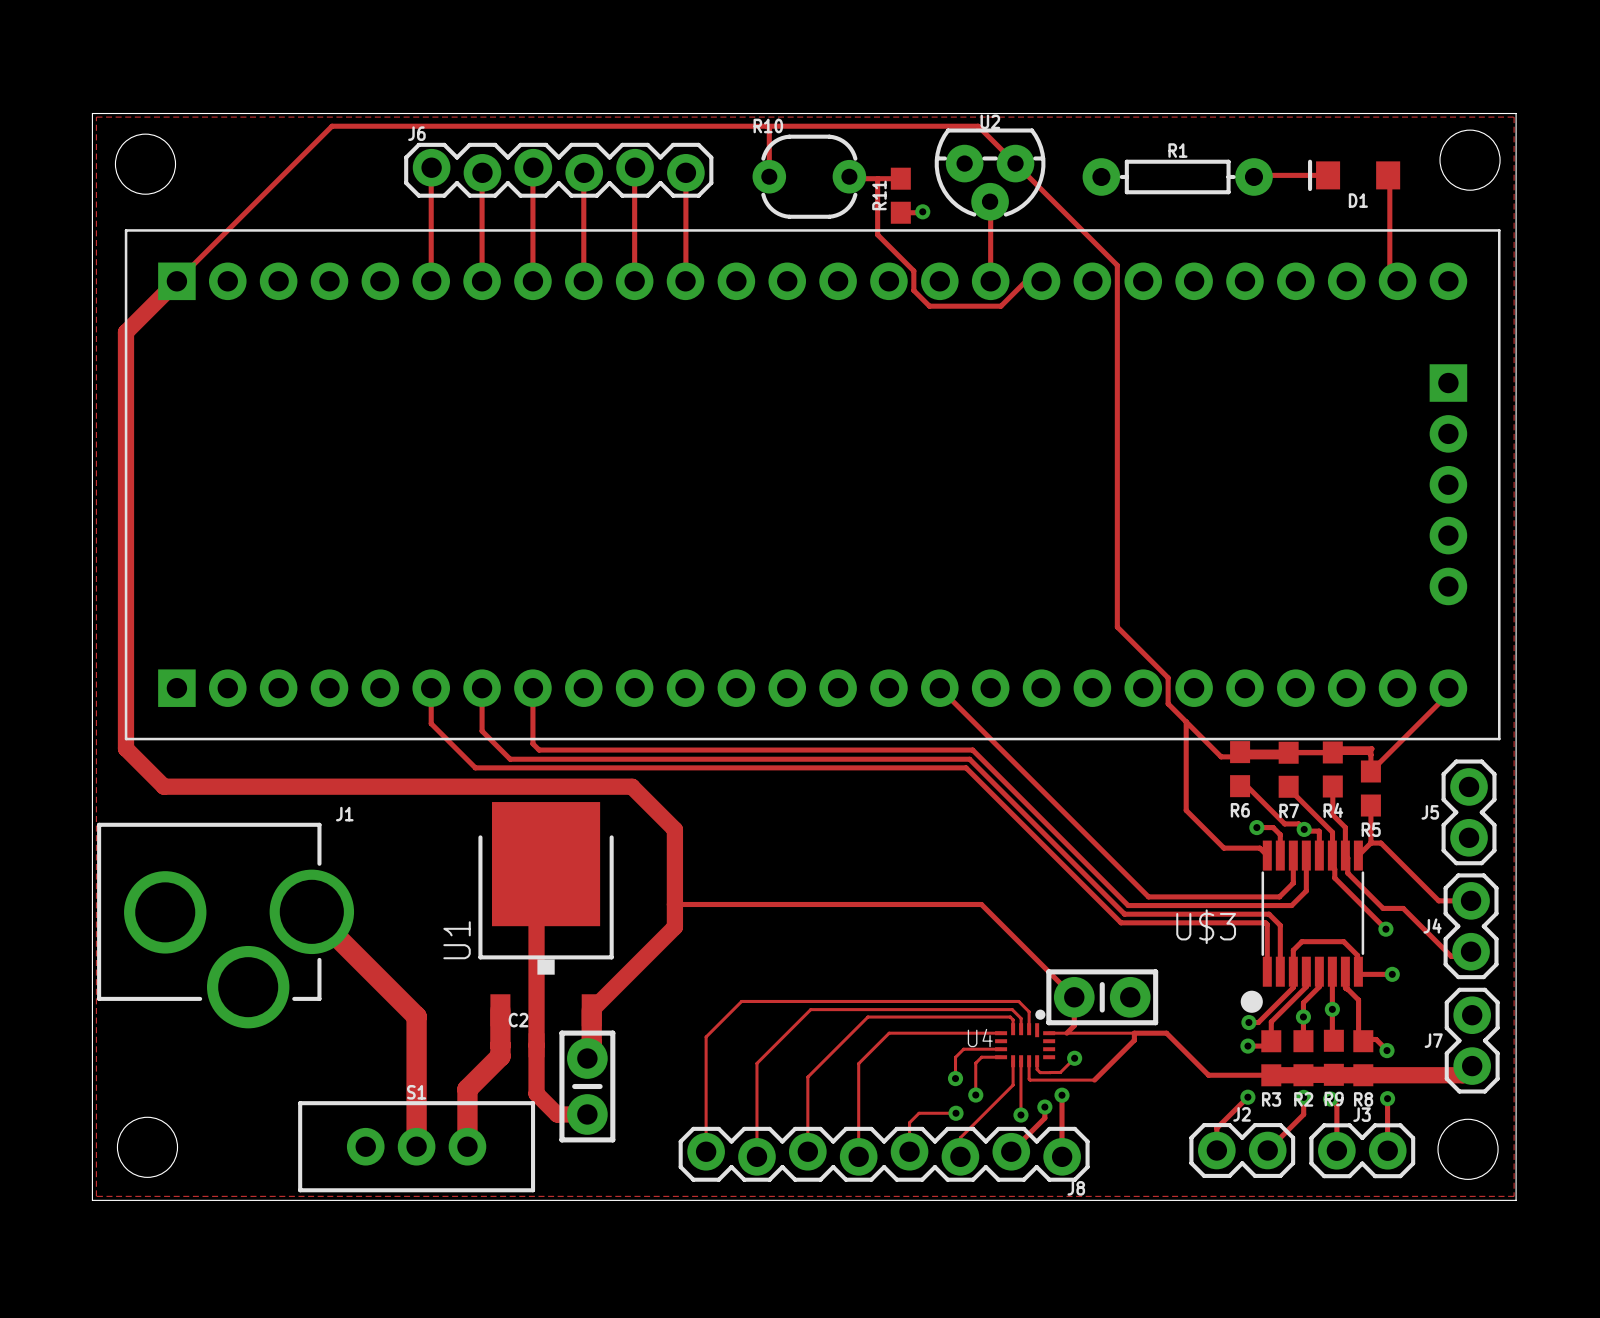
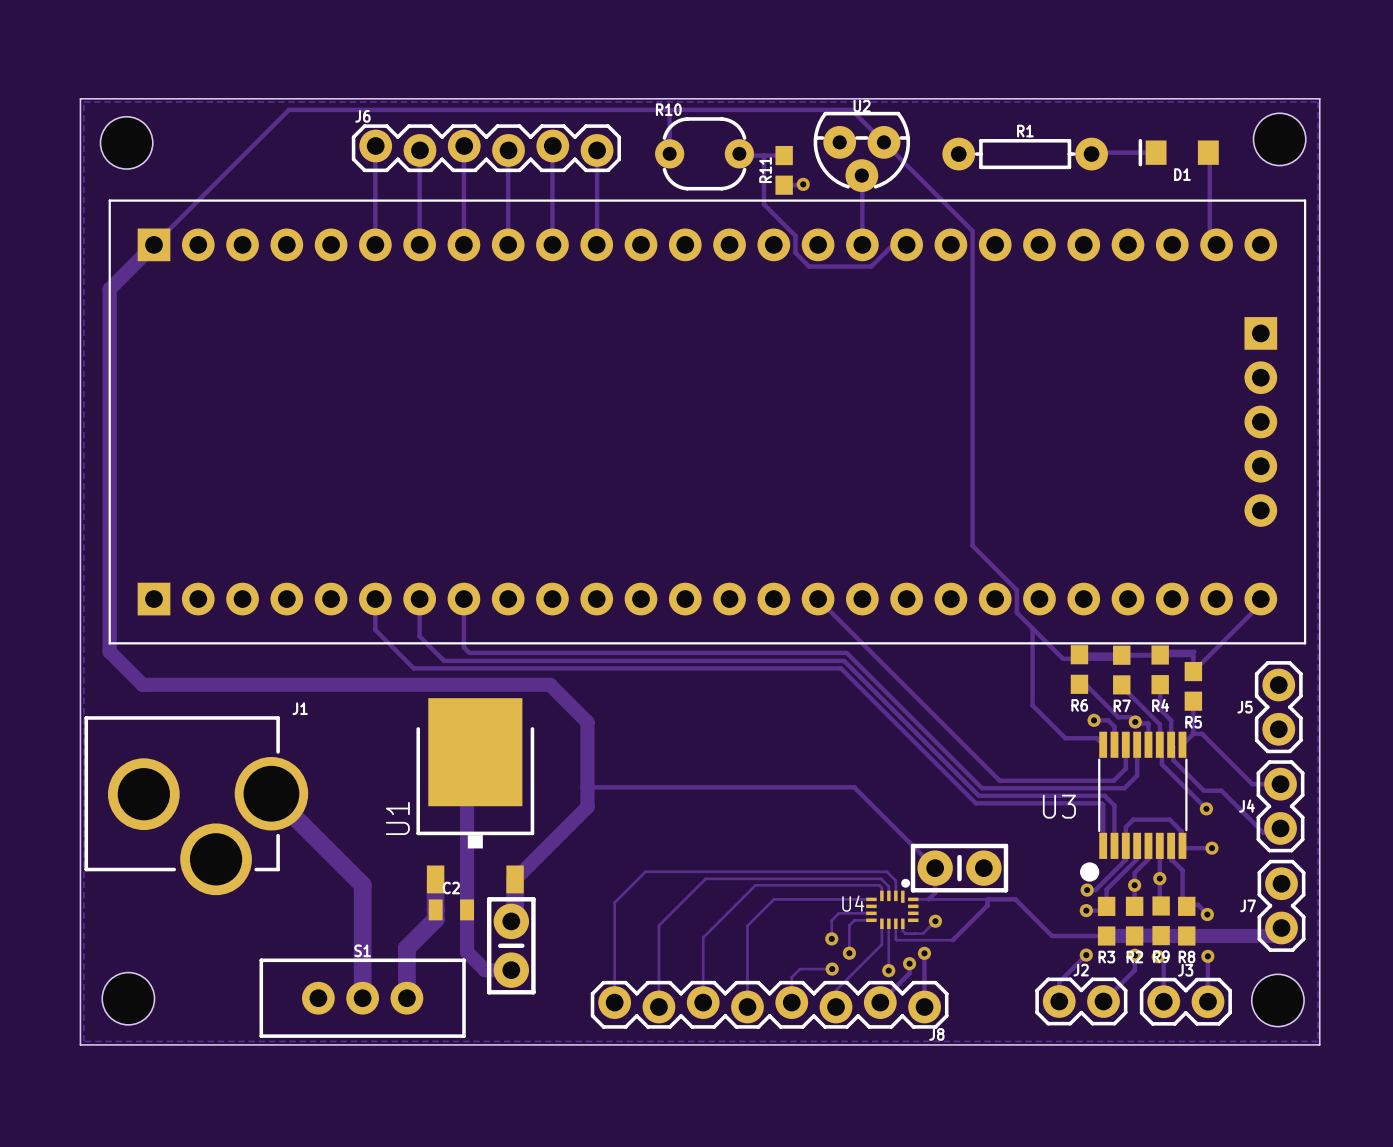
U$3 name: U$3 (1206, 926) -> U3 (1059, 806)

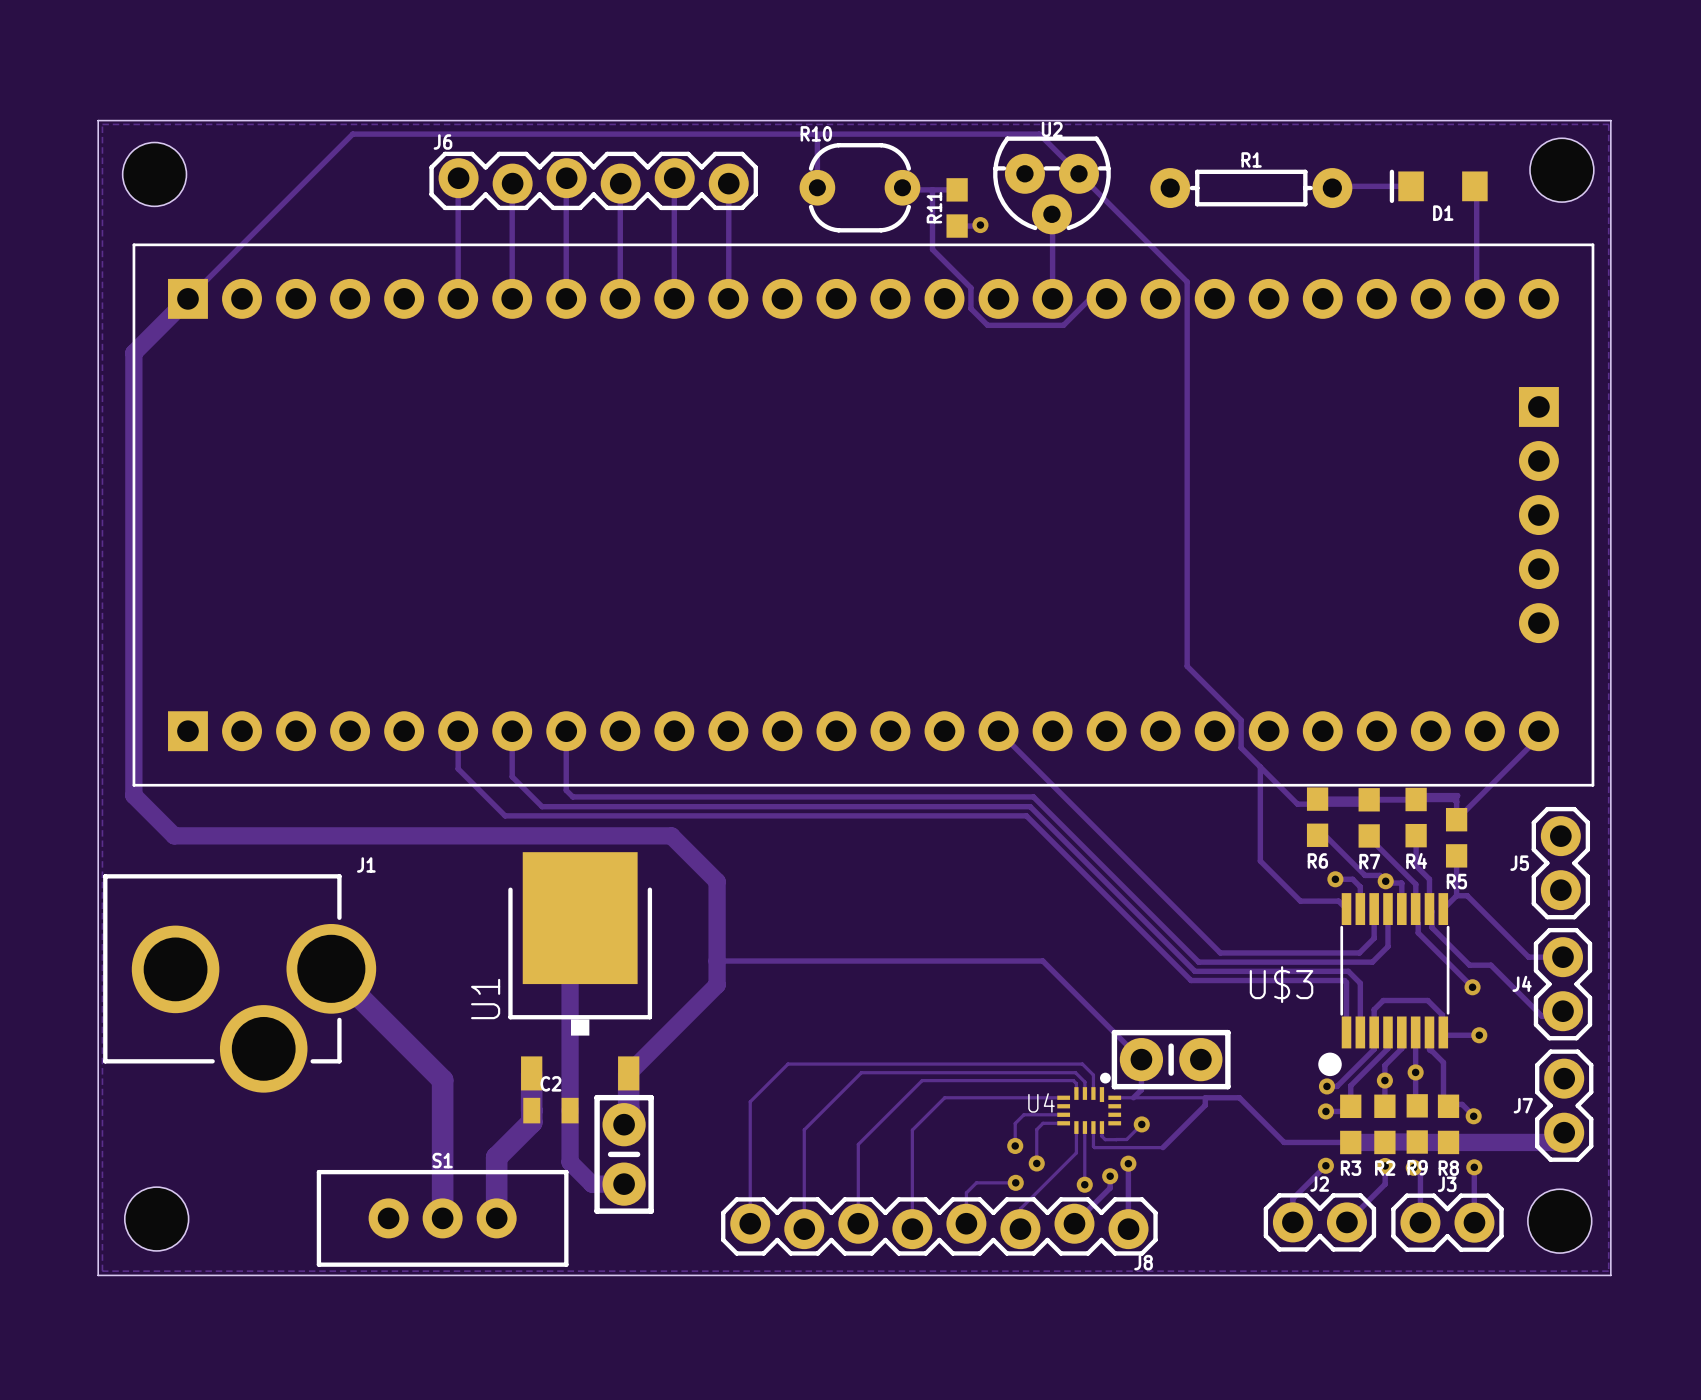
U3 name: U3 (1059, 806) -> U$3 (1281, 984)

